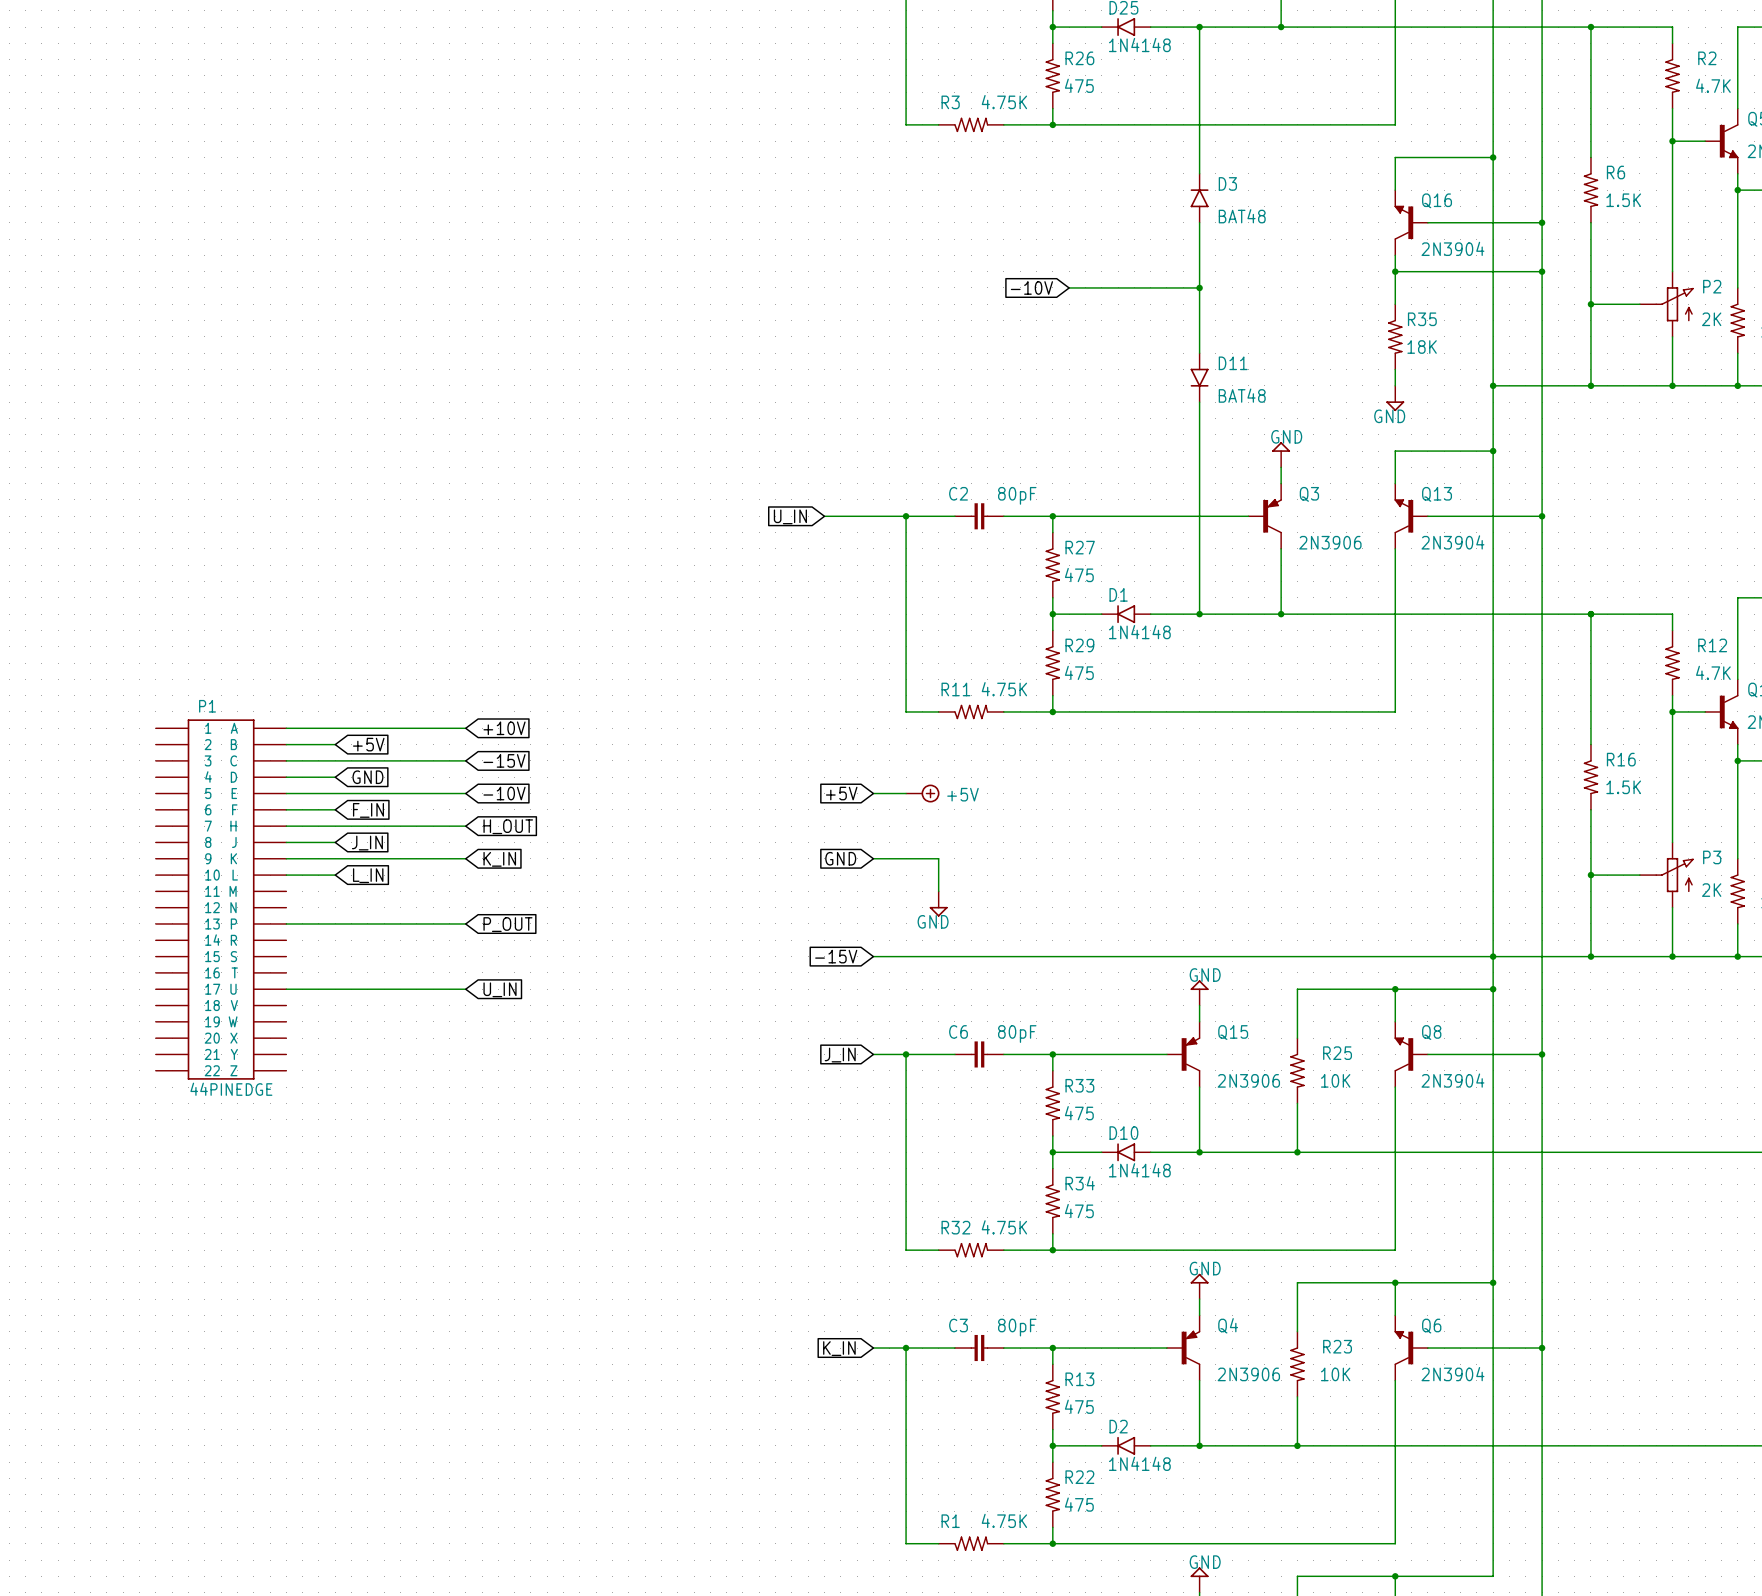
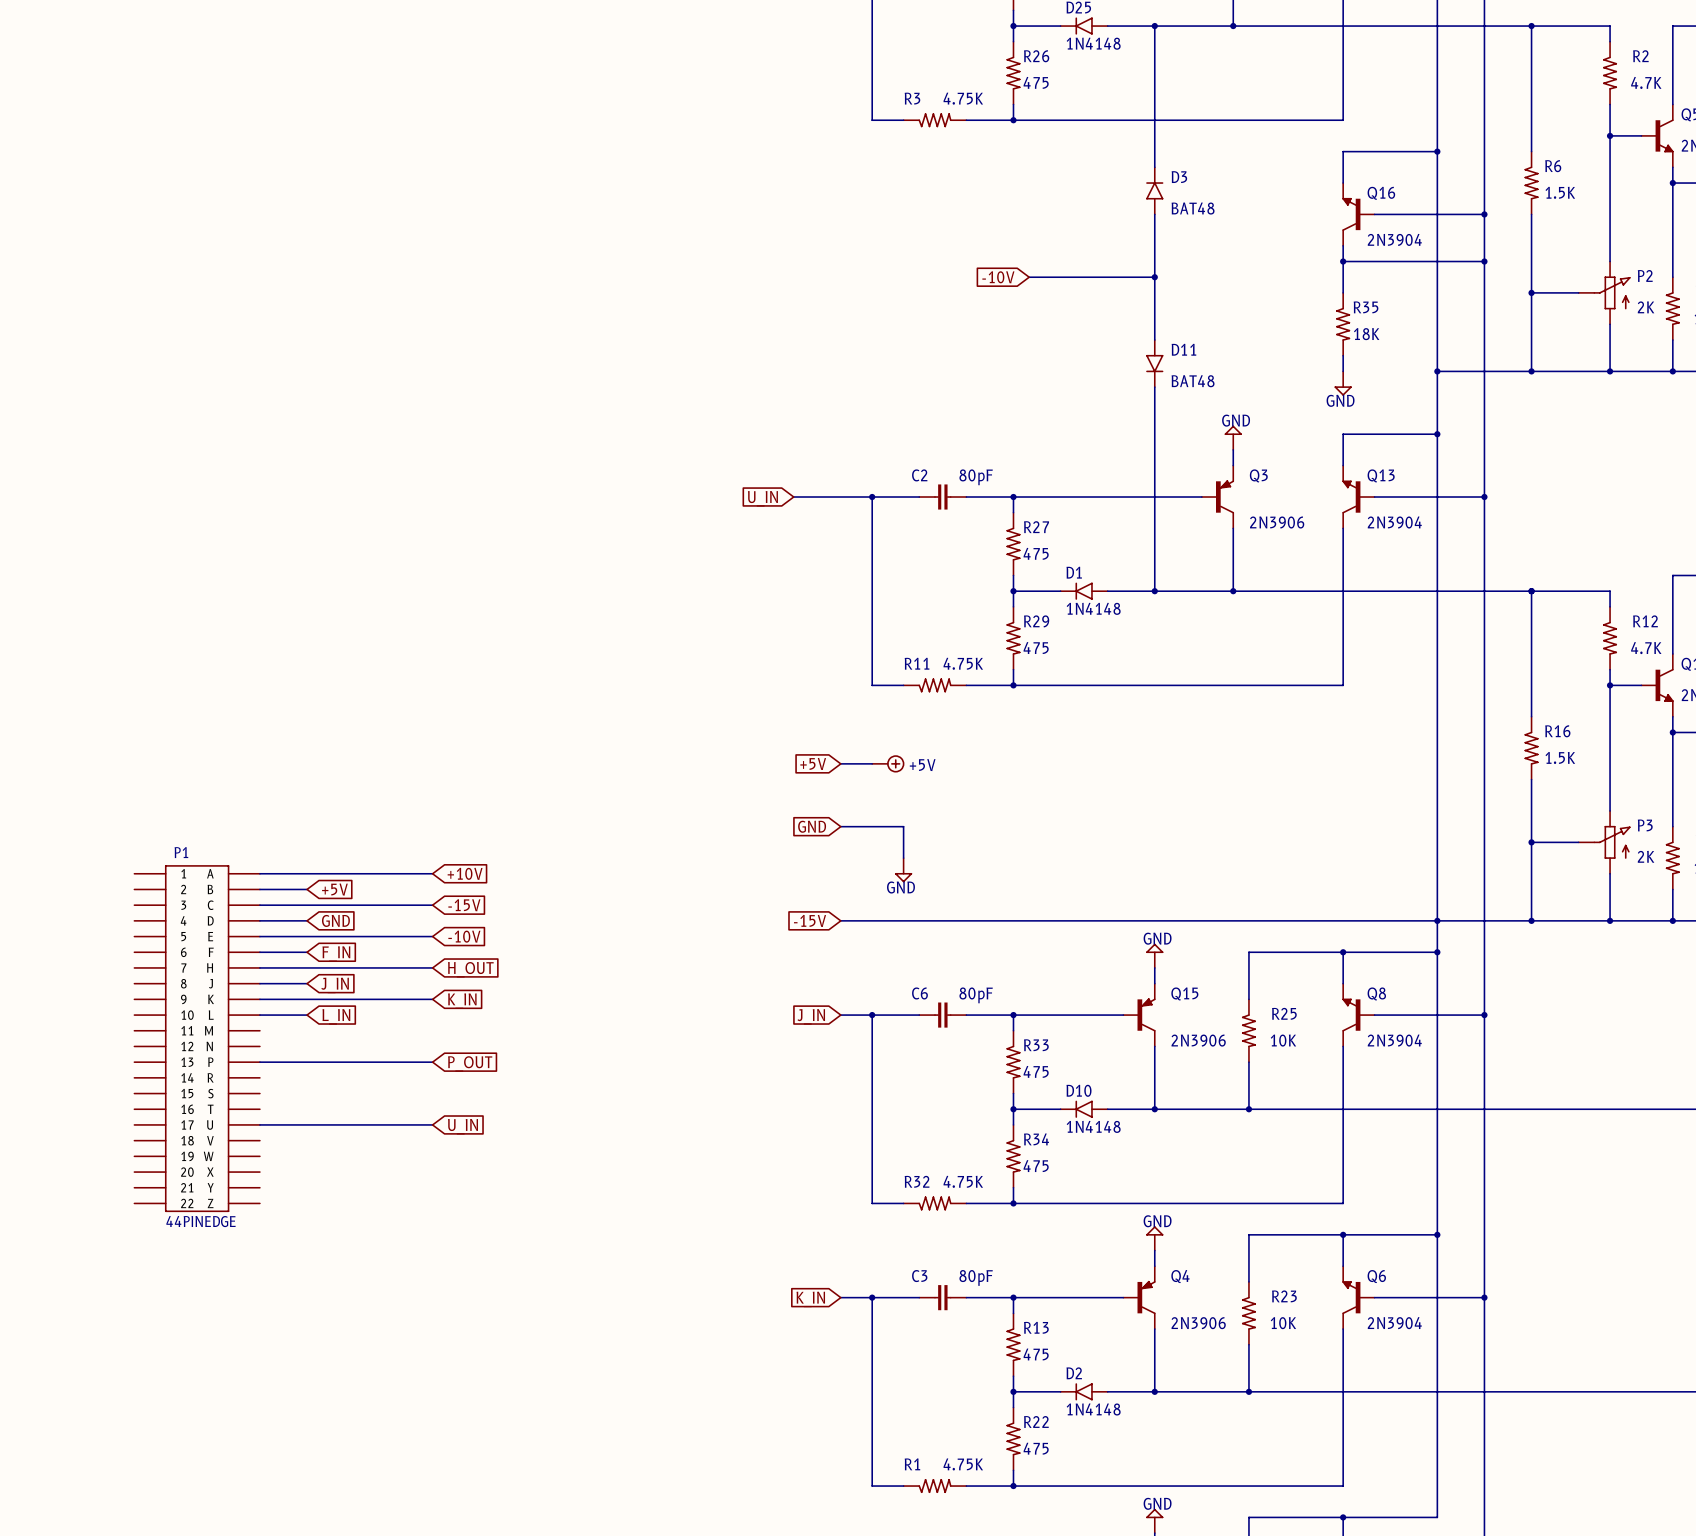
wire: (286, 728) (465, 728) -> none
global label: +10V (504, 728) -> none
wire: (286, 744) (335, 744) -> none
global label: +5V (368, 744) -> none
wire: (286, 760) (465, 760) -> (259, 873) (432, 873)
global label: -15V (504, 760) -> none
wire: (286, 777) (335, 777) -> none
global label: GND (367, 777) -> none
wire: (286, 793) (465, 793) -> (259, 905) (432, 905)
global label: -10V (504, 793) -> none
wire: (286, 809) (335, 809) -> (259, 920) (307, 920)
global label: F_IN (368, 810) -> none
wire: (286, 826) (465, 826) -> (259, 936) (432, 936)
global label: H_OUT (508, 826) -> none
wire: (286, 842) (335, 842) -> none
global label: J_IN (367, 843) -> none
wire: (286, 858) (465, 858) -> (259, 967) (432, 967)
global label: K_IN (499, 859) -> none
wire: (286, 875) (335, 875) -> (259, 983) (307, 983)
global label: L_IN (368, 875) -> none
P1 position: (221, 899) -> (197, 1038)
global label: none -> +10V (465, 873)
wire: (318, 923) (465, 923) -> none
global label: none -> +5V (334, 889)
global label: P_OUT (507, 924) -> none
global label: none -> -15V (464, 905)
global label: none -> GND (335, 920)
global label: none -> -10V (464, 936)
wire: (318, 989) (465, 989) -> none
global label: none -> F_IN (336, 954)
global label: U_IN (500, 989) -> none
global label: none -> H_OUT (470, 969)
global label: none -> J_IN (335, 985)
wire: none -> (259, 999) (432, 999)
global label: none -> K_IN (462, 1001)
wire: none -> (259, 1015) (307, 1015)
global label: none -> L_IN (336, 1016)
wire: none -> (259, 1062) (432, 1062)
global label: none -> P_OUT (470, 1063)
wire: none -> (259, 1124) (432, 1124)
global label: none -> U_IN (463, 1126)

